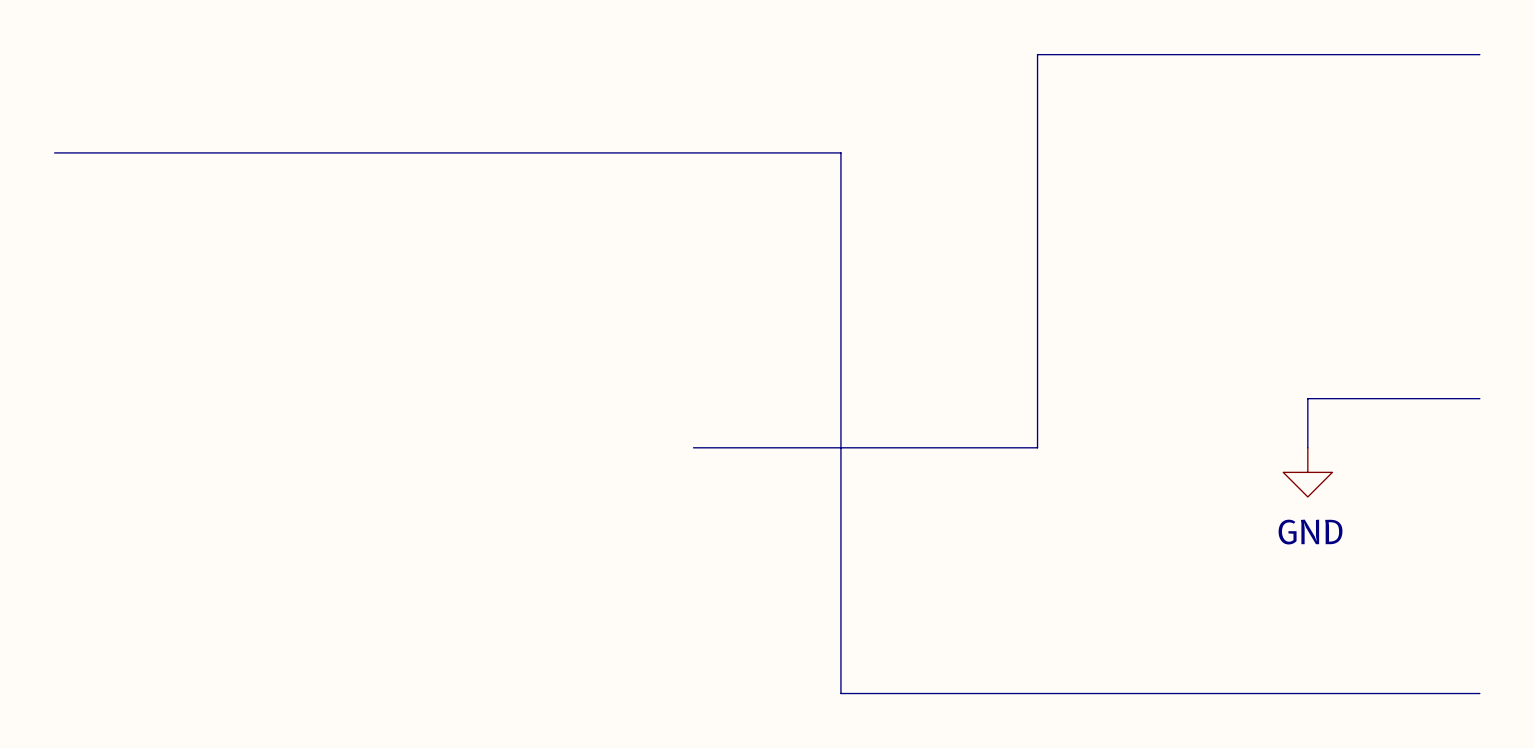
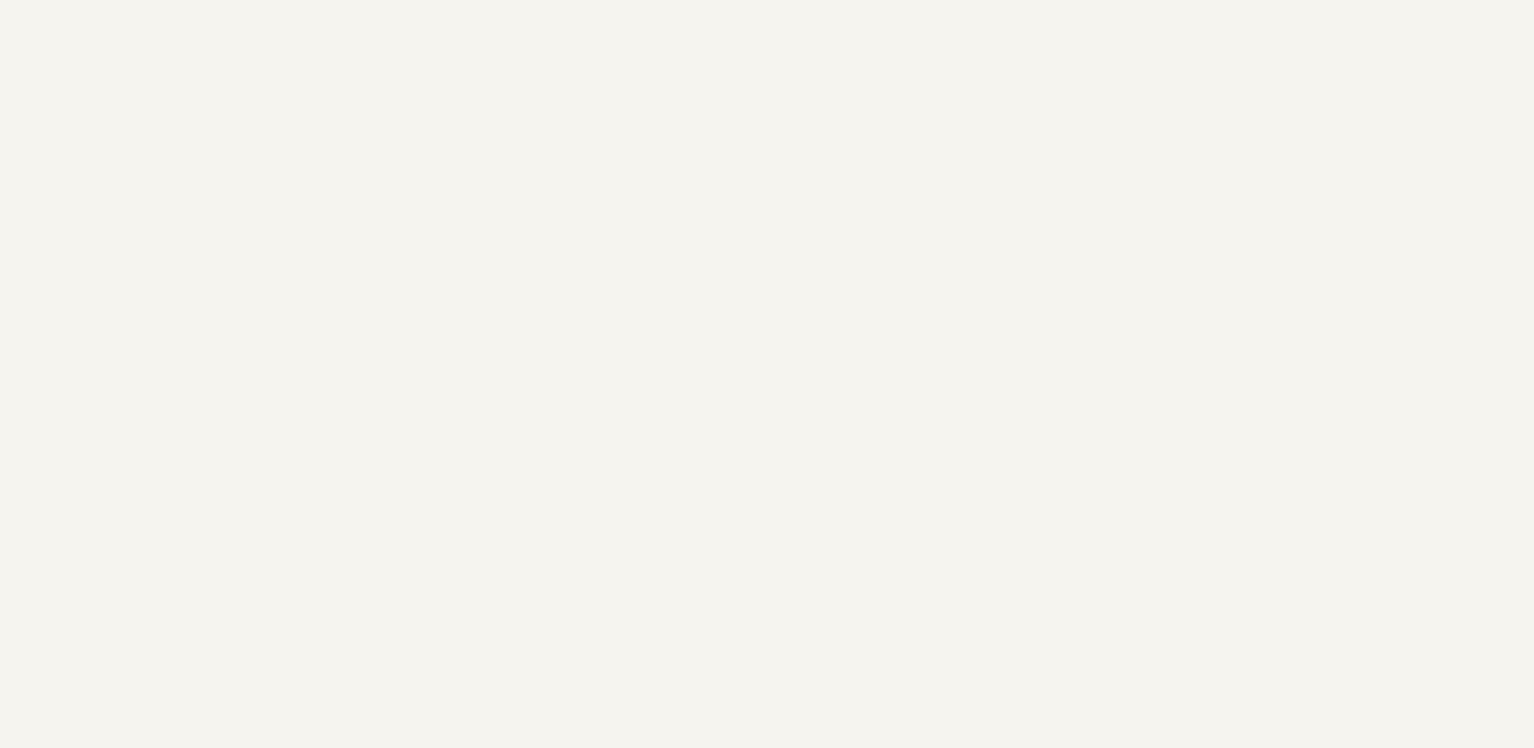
wire: (1479, 54) (1037, 54) (1037, 447) (693, 447) -> none
wire: (54, 152) (840, 152) (840, 693) (1479, 693) -> none
wire: (1479, 398) (1307, 398) (1307, 447) -> none
power symbol: GND (1307, 472) -> none

